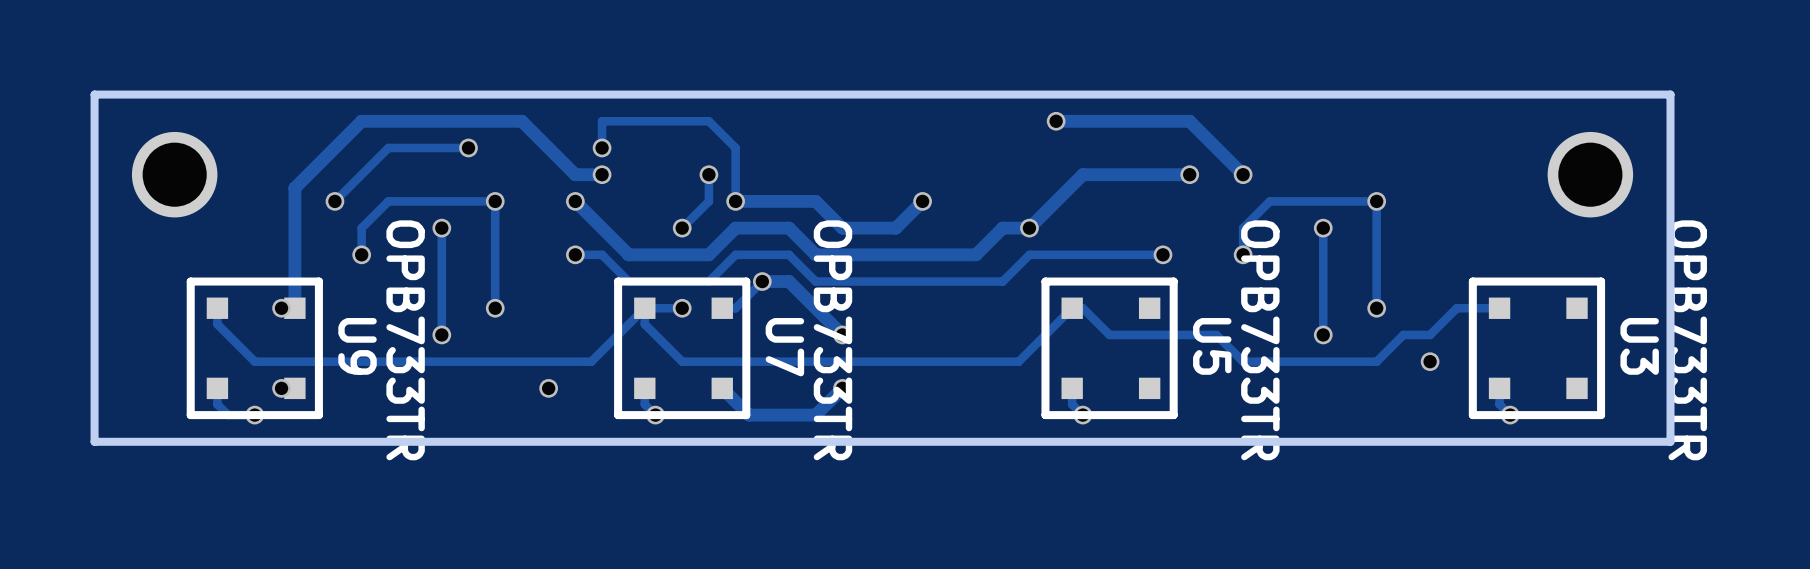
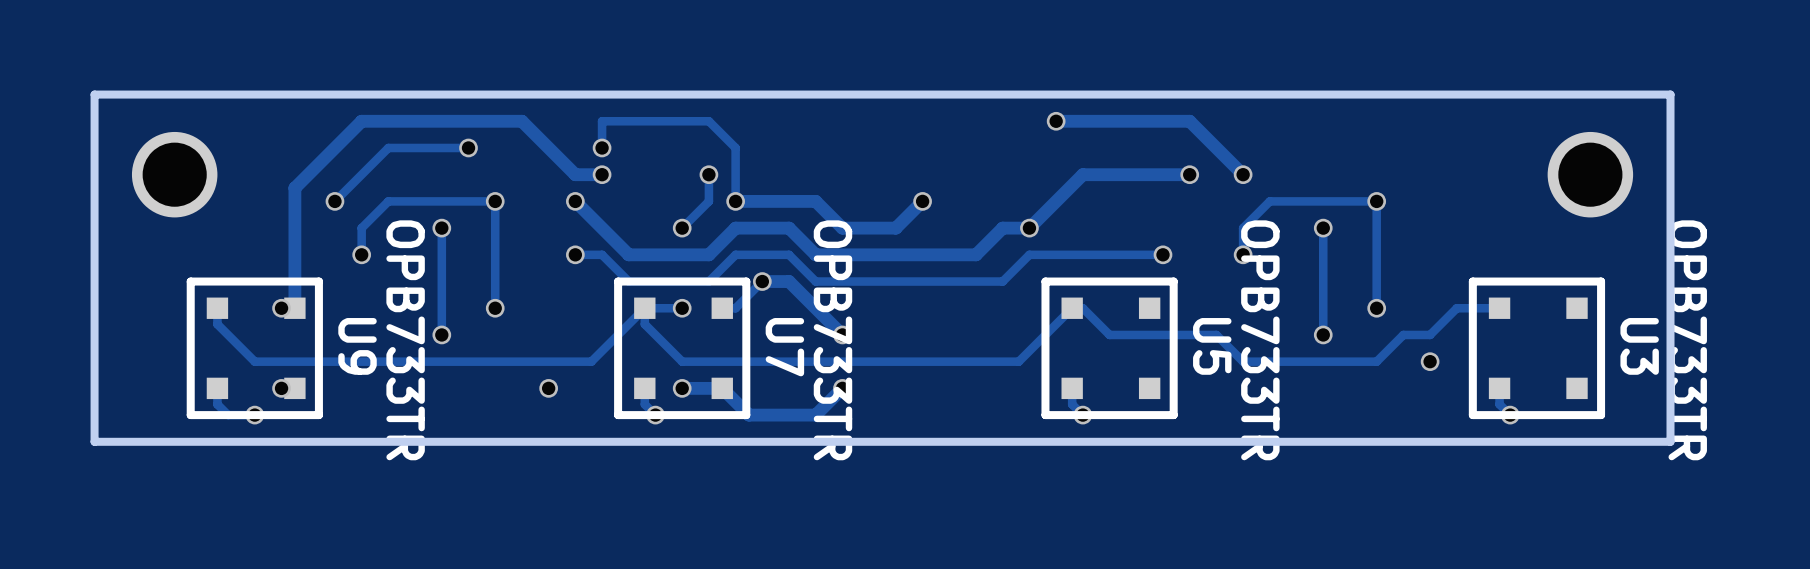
via: none -> (682, 388)
track: none -> (722, 388) (682, 388)

